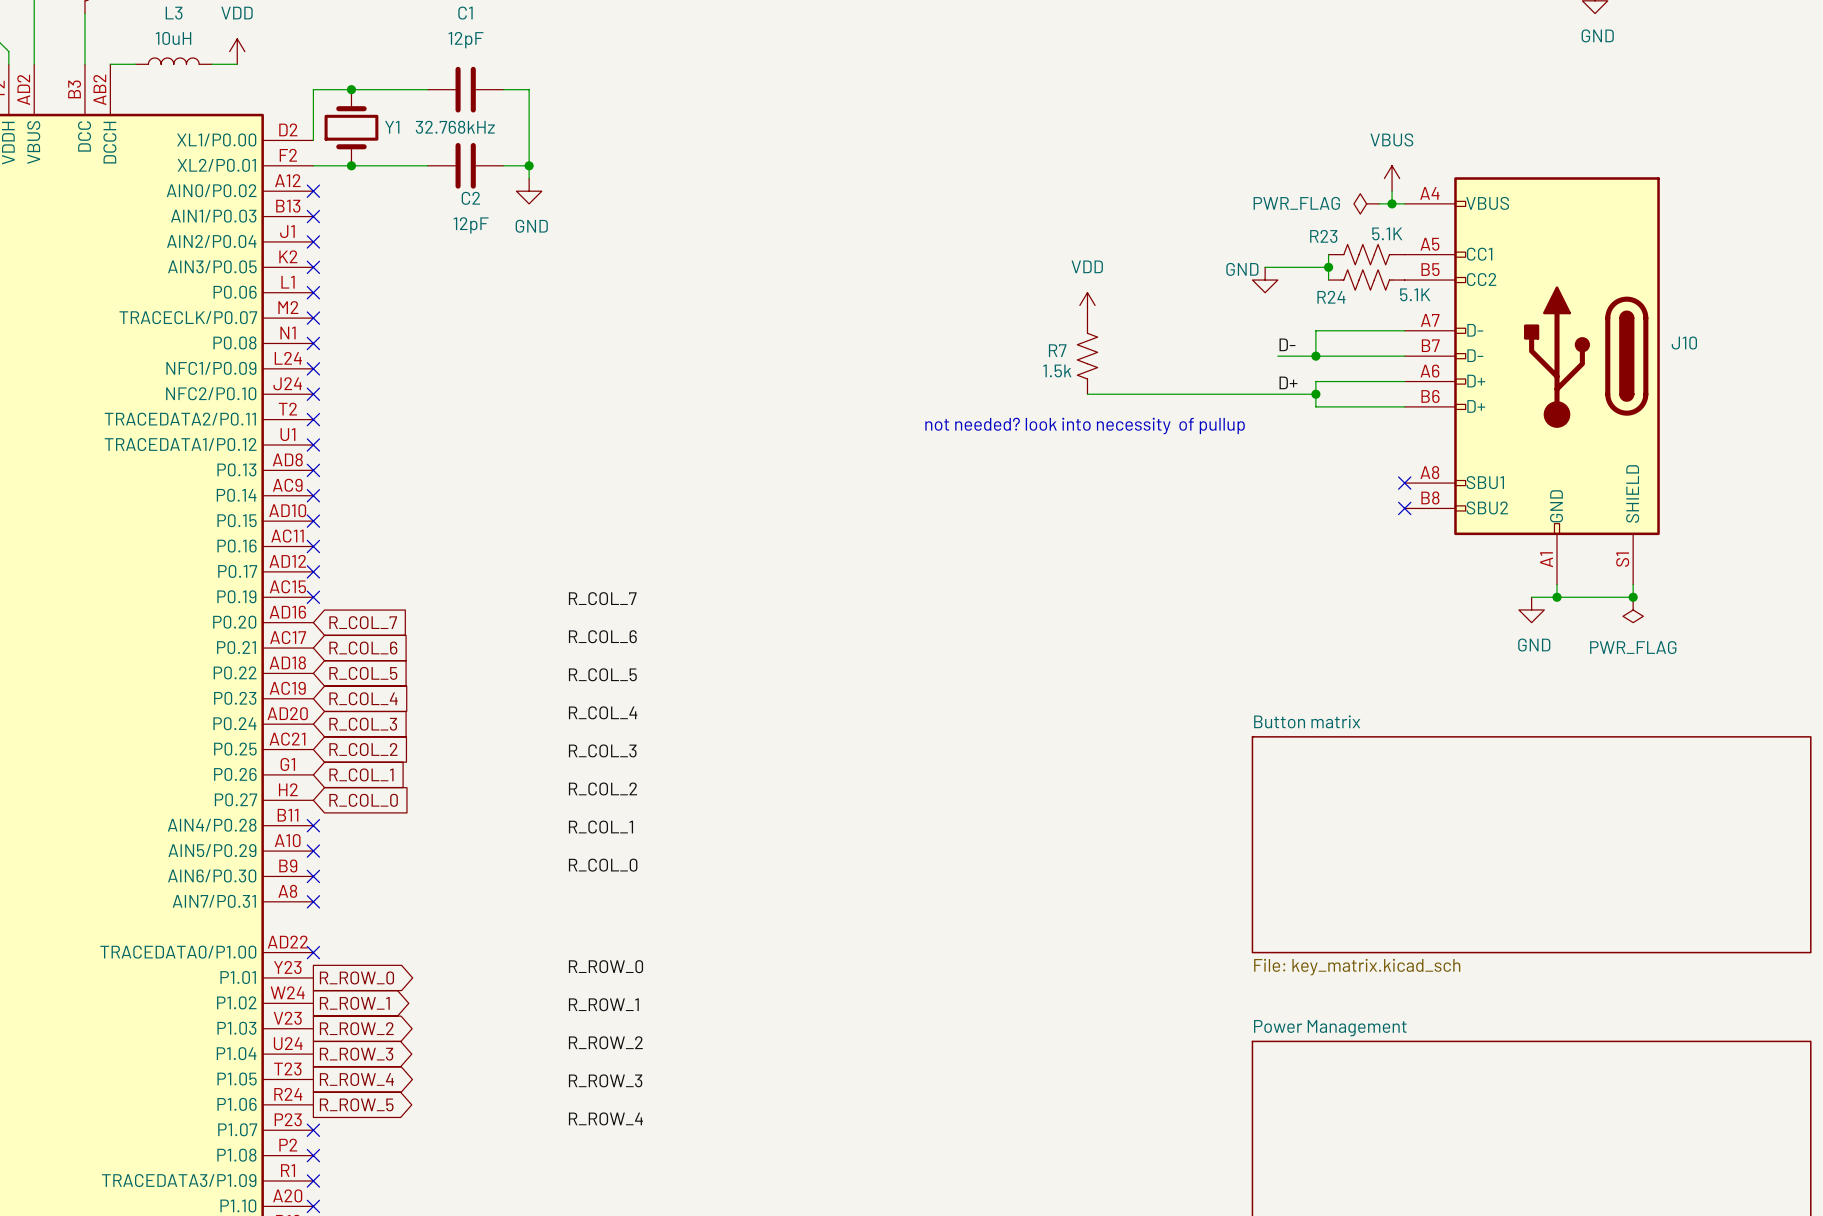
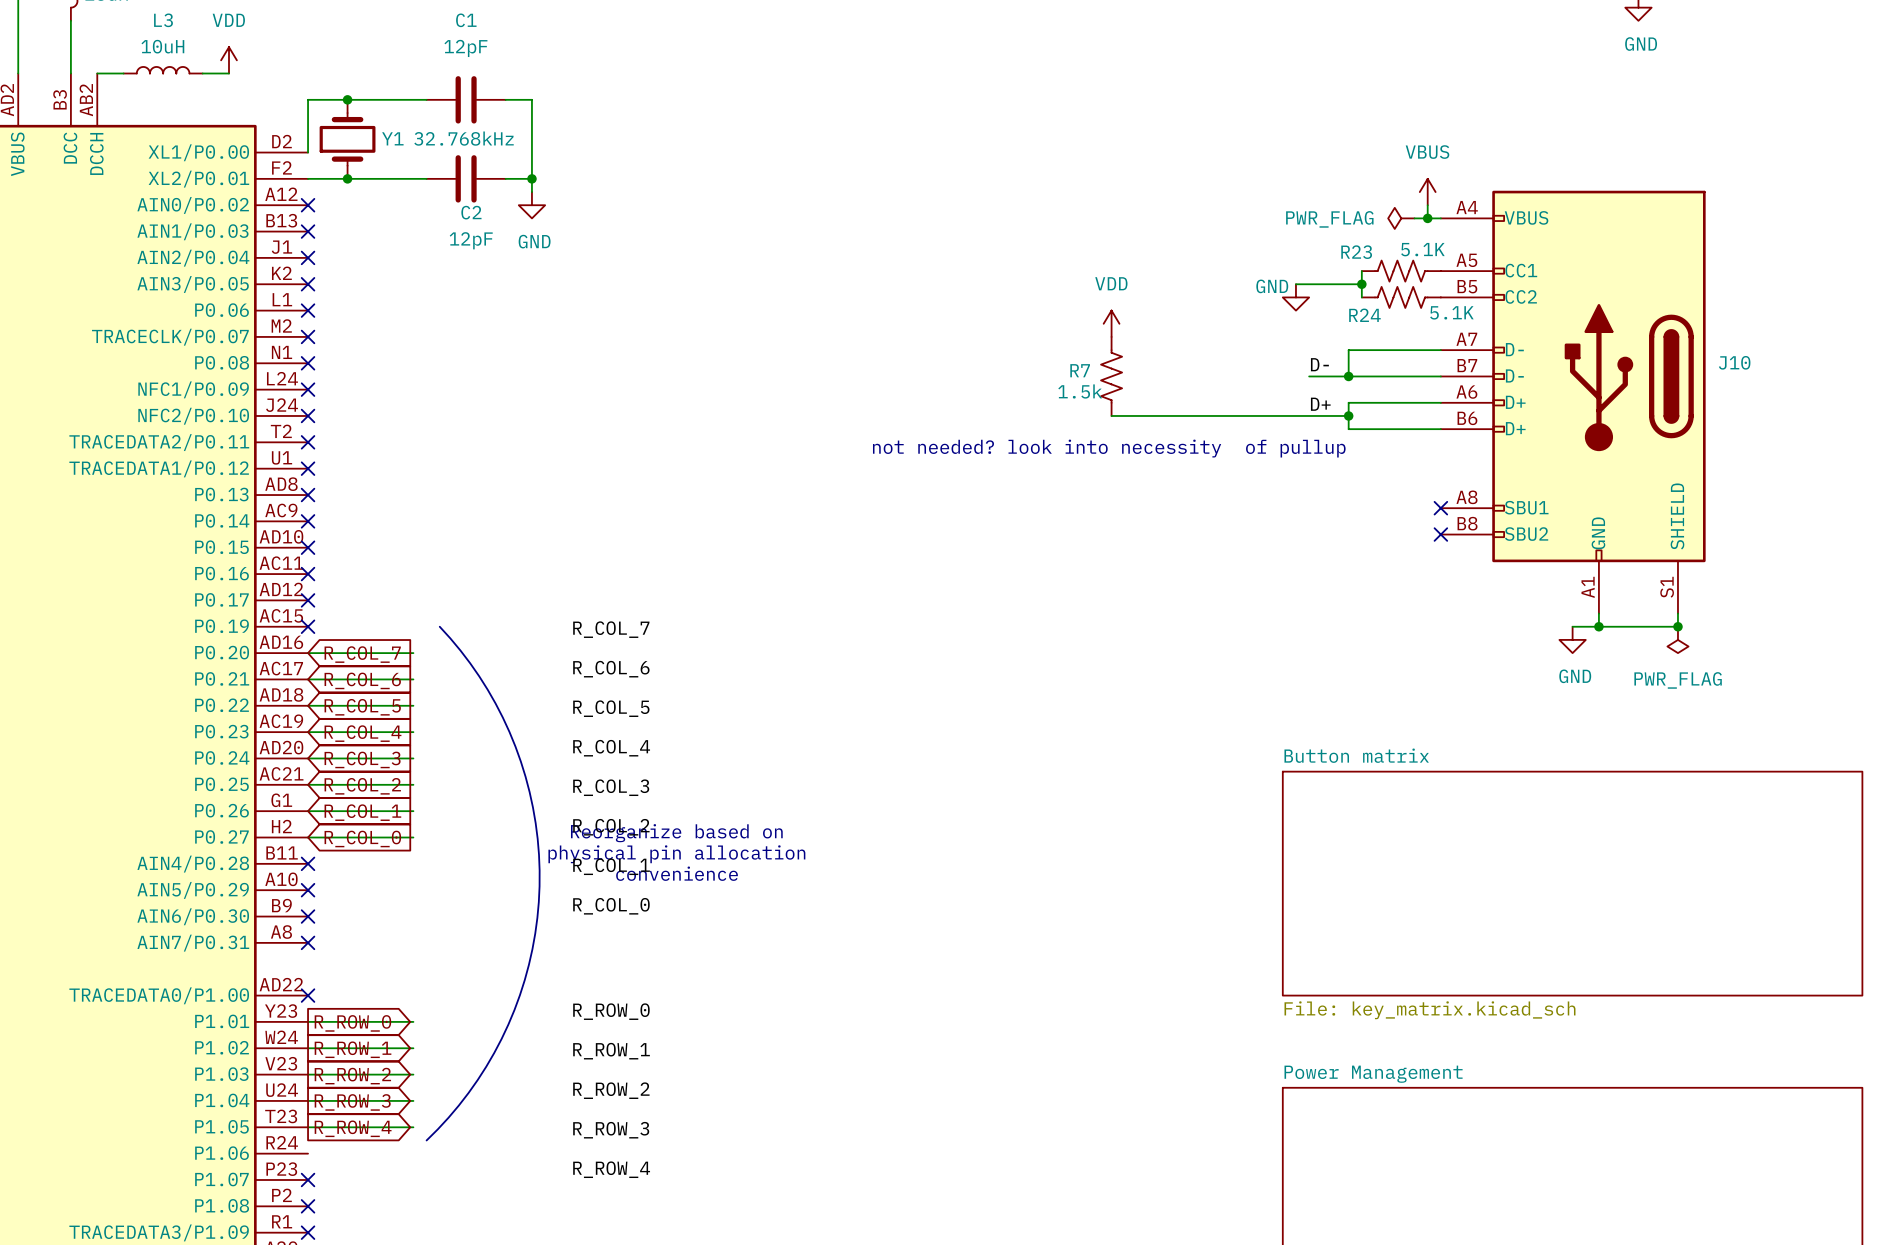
line: none -> (439, 626) (460, 650) (487, 689) (515, 746) (532, 807) (539, 854) (539, 886) (537, 917) (528, 964) (508, 1024) (477, 1080) (458, 1105) (426, 1140)
wire: none -> (308, 653) (413, 653)
wire: none -> (308, 679) (413, 679)
wire: none -> (308, 705) (413, 705)
wire: none -> (308, 732) (413, 732)
wire: none -> (308, 758) (413, 758)
wire: none -> (308, 784) (413, 784)
wire: none -> (308, 811) (413, 811)
text: none -> Reorganize based on (676, 833)
wire: none -> (308, 837) (413, 837)
text: none -> physical pin allocation (676, 854)
text: none -> convenience (677, 873)
wire: none -> (308, 1021) (413, 1021)
wire: none -> (308, 1048) (413, 1048)
wire: none -> (308, 1074) (413, 1074)
wire: none -> (308, 1100) (413, 1100)
wire: none -> (308, 1127) (413, 1127)
global label: R_ROW_5 (356, 1104) -> none

